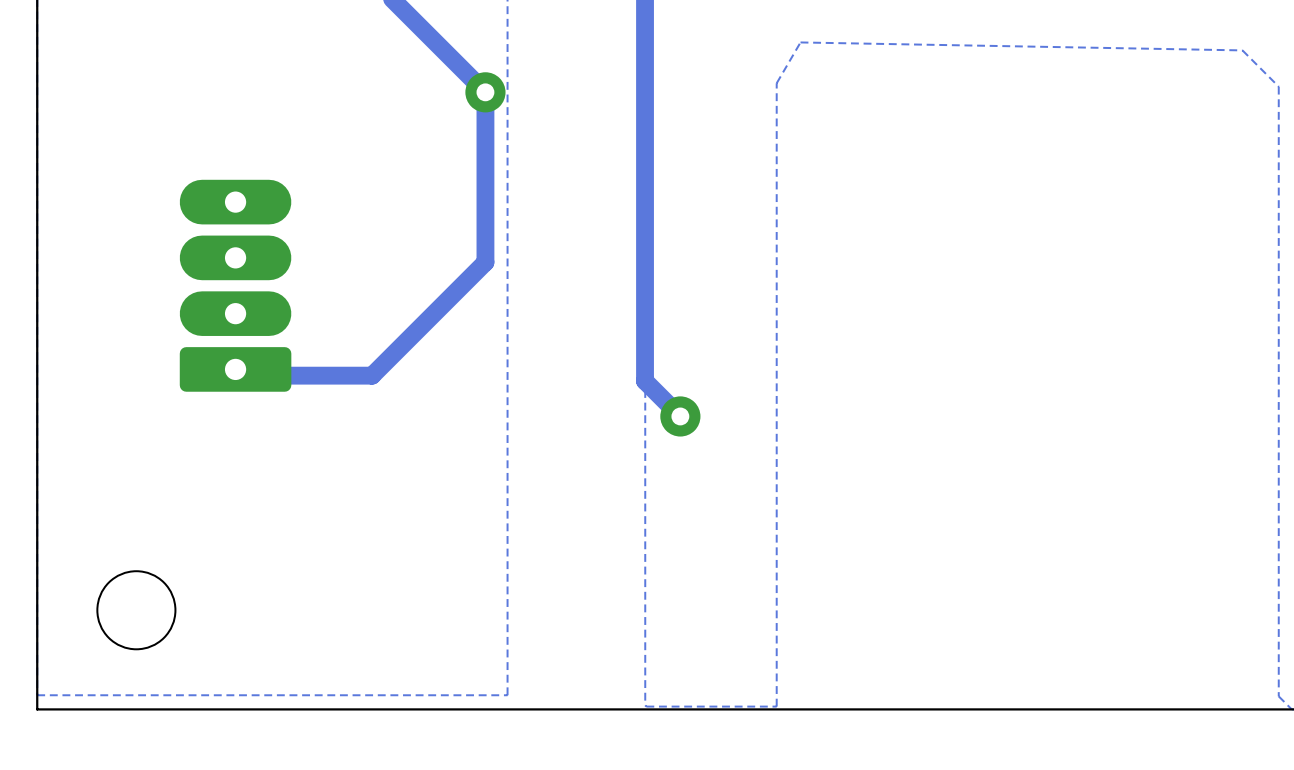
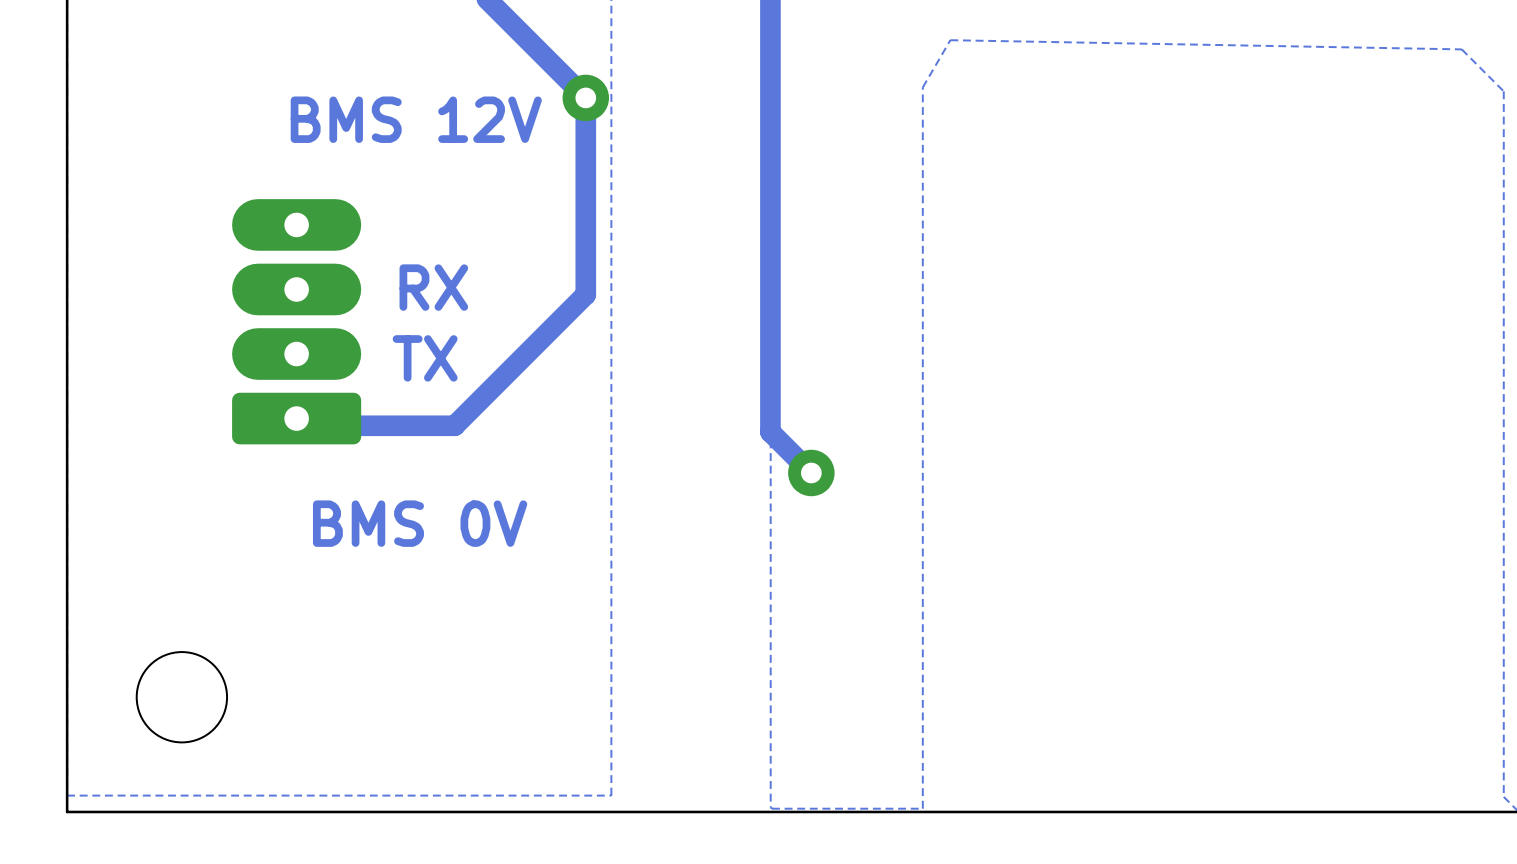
text: none -> BMS 12V (416, 119)
text: none -> RX (433, 287)
text: none -> TX (425, 358)
text: none -> BMS 0V (420, 523)

